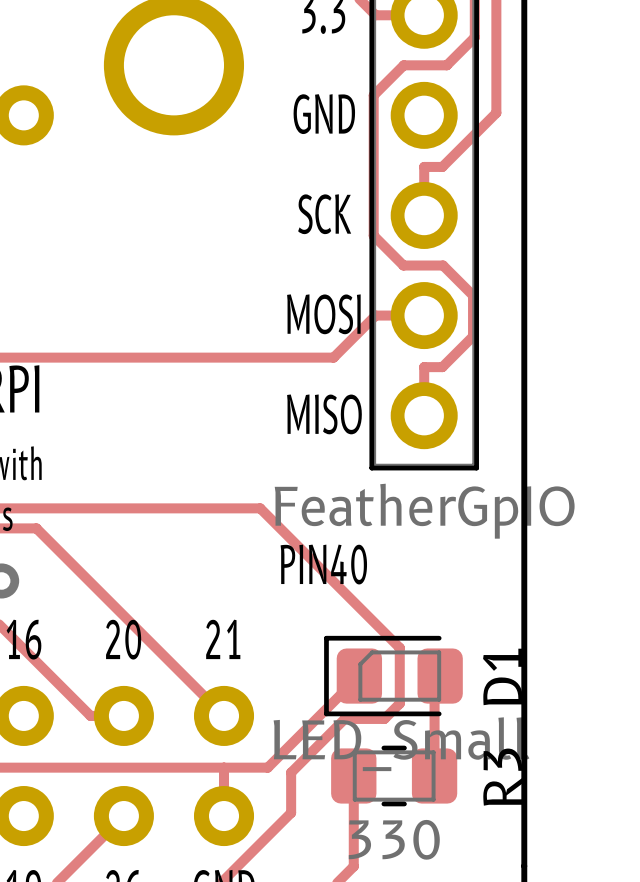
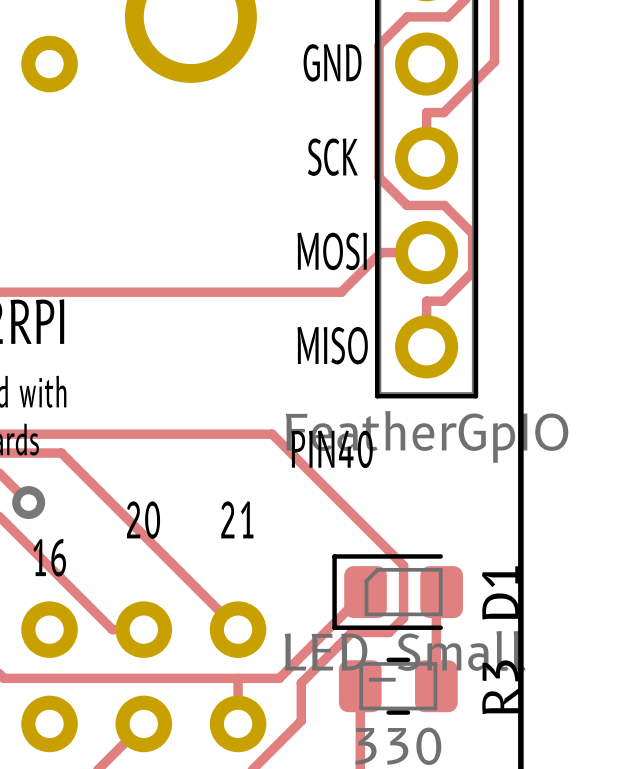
text position: PIN40 (323, 564) -> PIN40 (332, 449)
text position: 20 (123, 639) -> 20 (143, 520)
text position: 21 (223, 639) -> 21 (237, 519)

